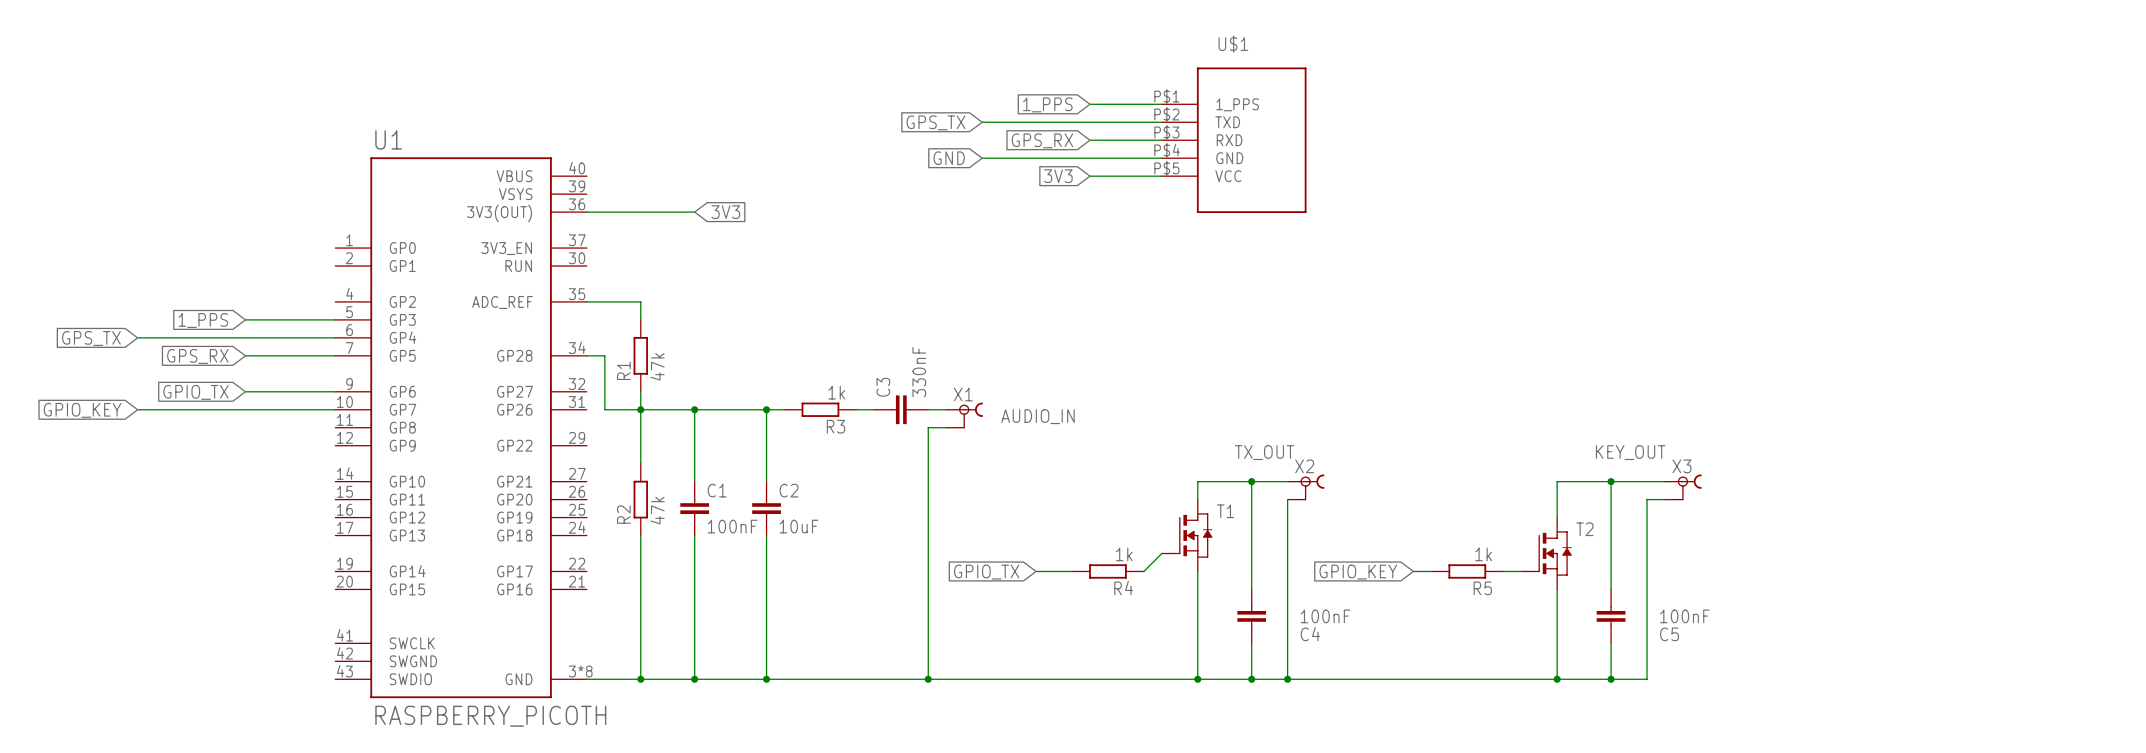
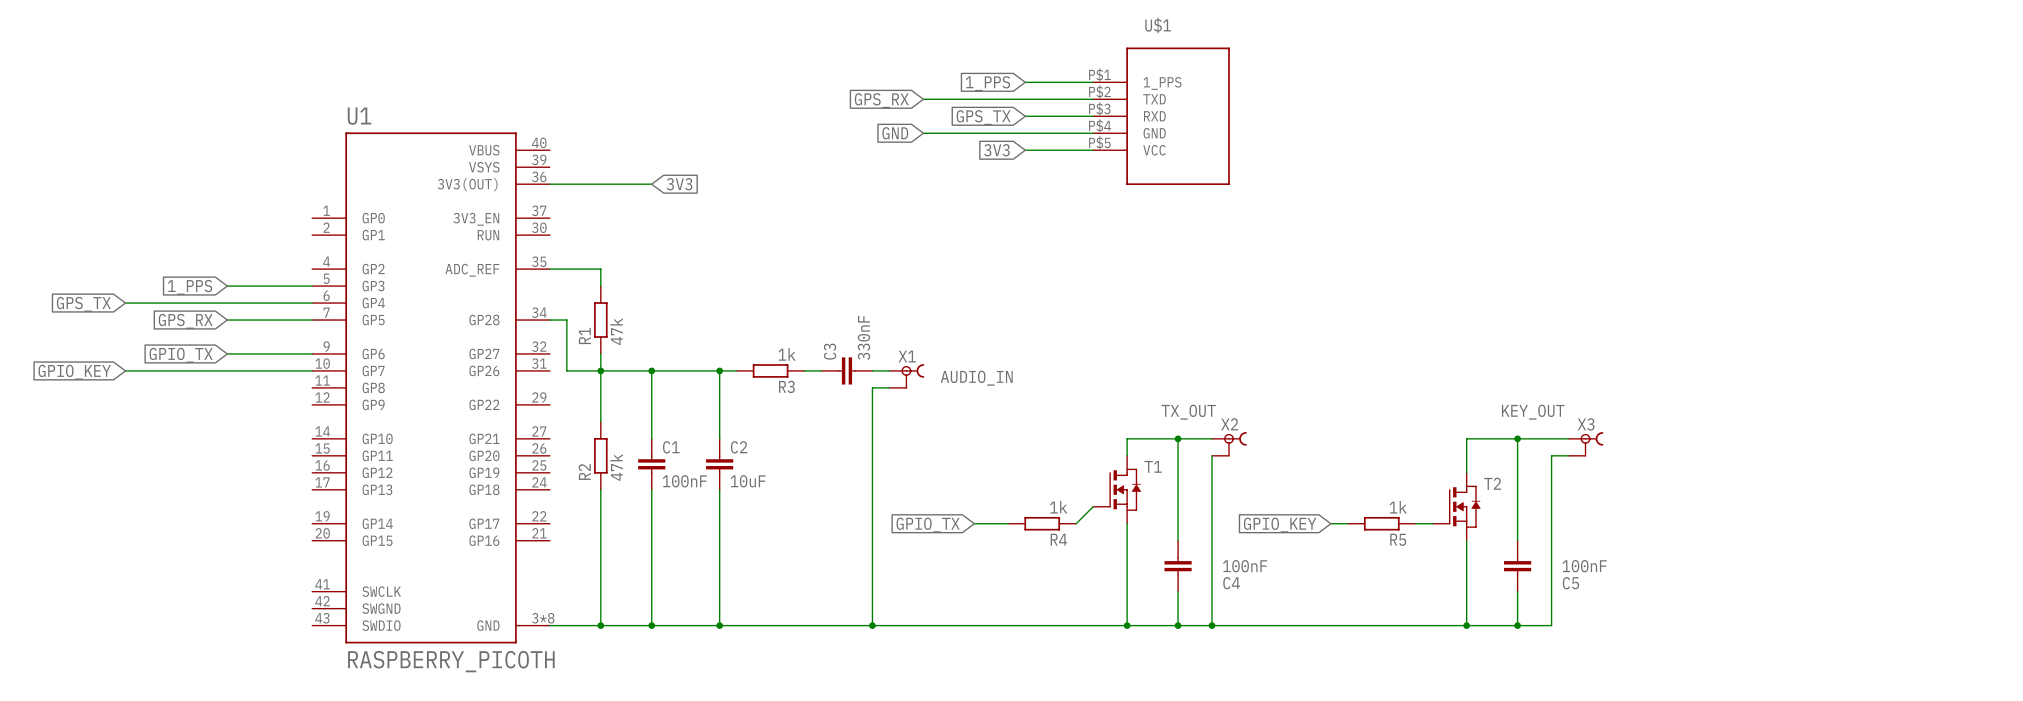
global label: GPS_TX (935, 122) -> GPS_RX (881, 100)
global label: GPS_RX (1042, 140) -> GPS_TX (983, 117)

